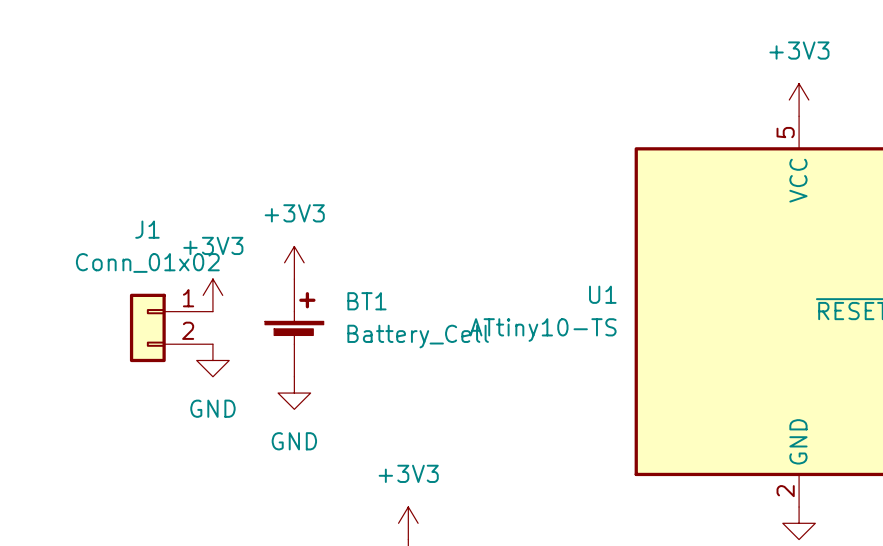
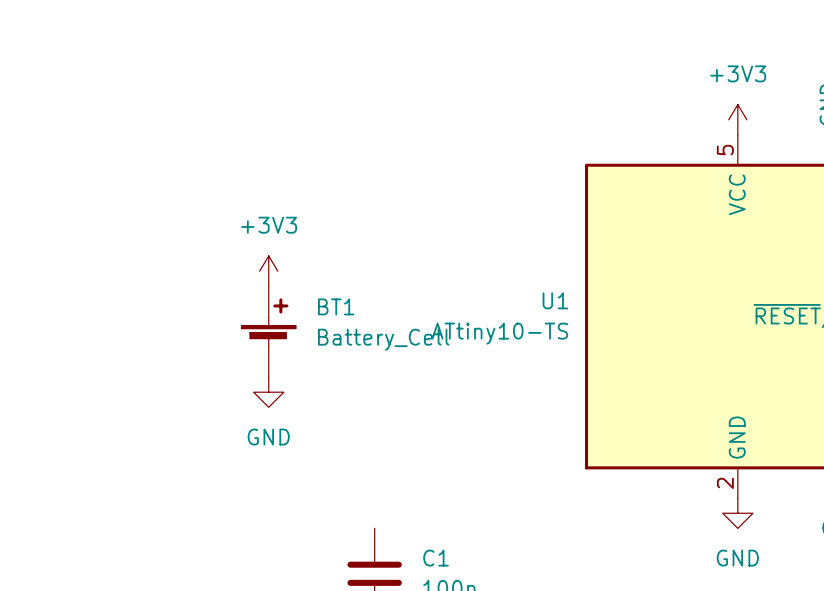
power symbol: +3V3 (212, 295) -> none
J1: Conn_01x02 (171, 327) -> none
power symbol: GND (212, 360) -> none
power symbol: +3V3 (408, 523) -> none

